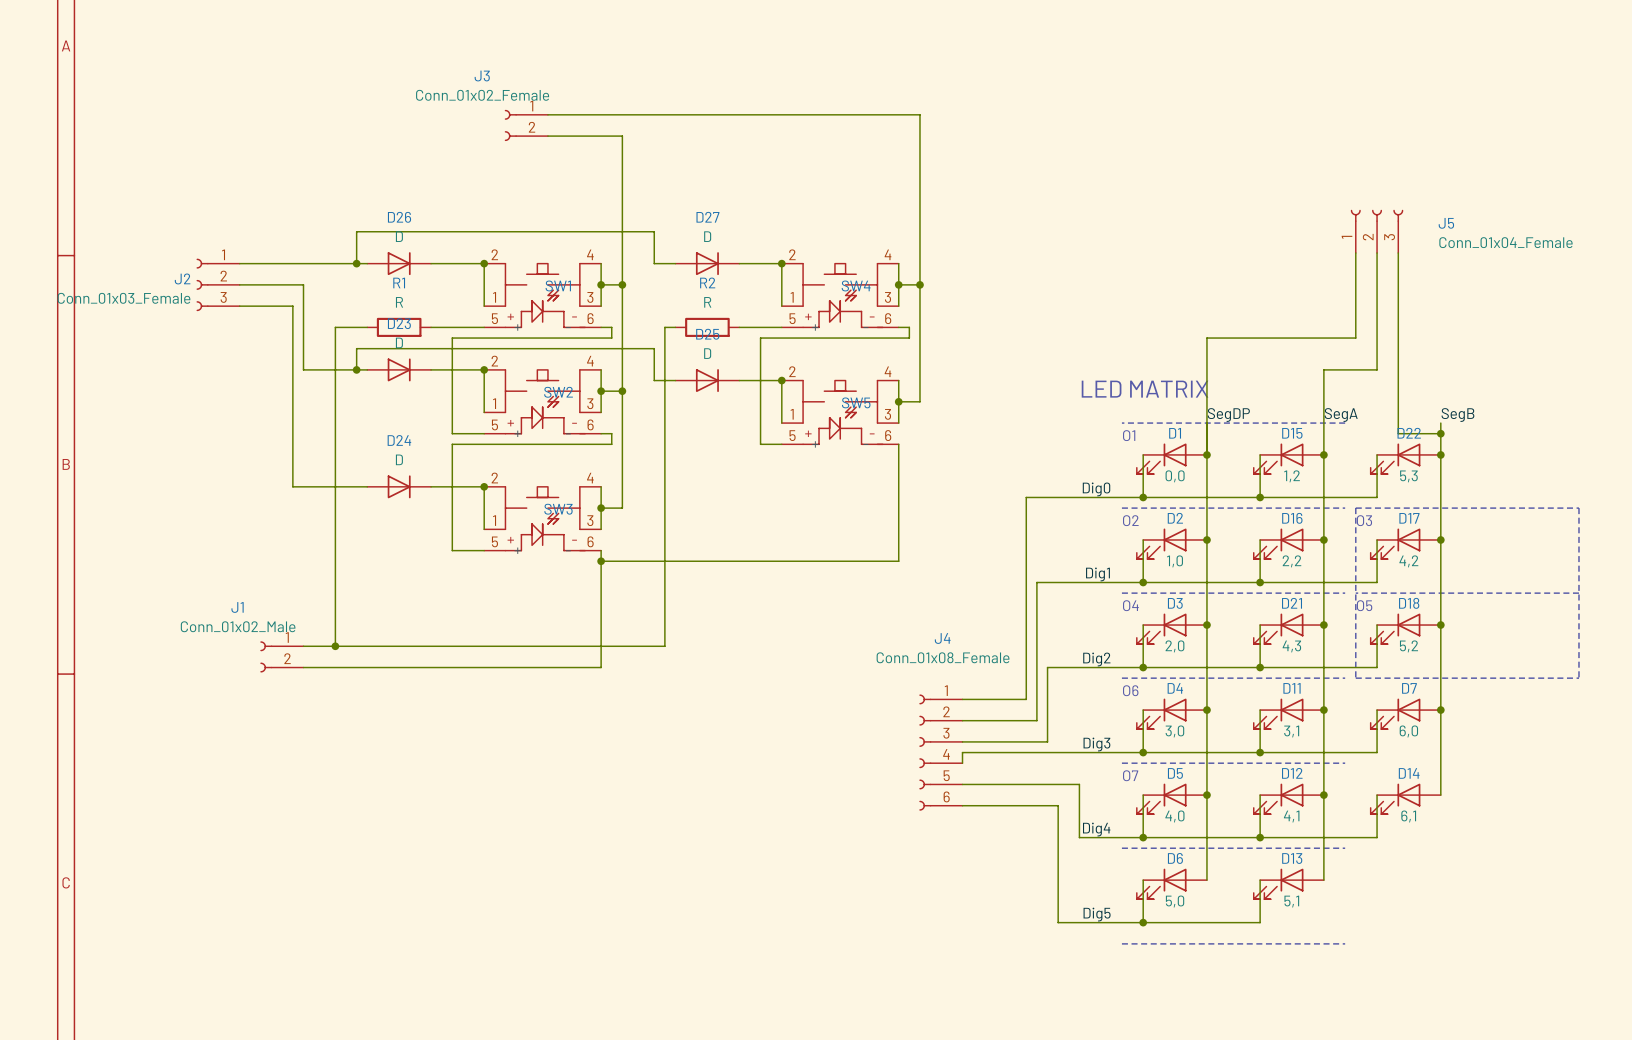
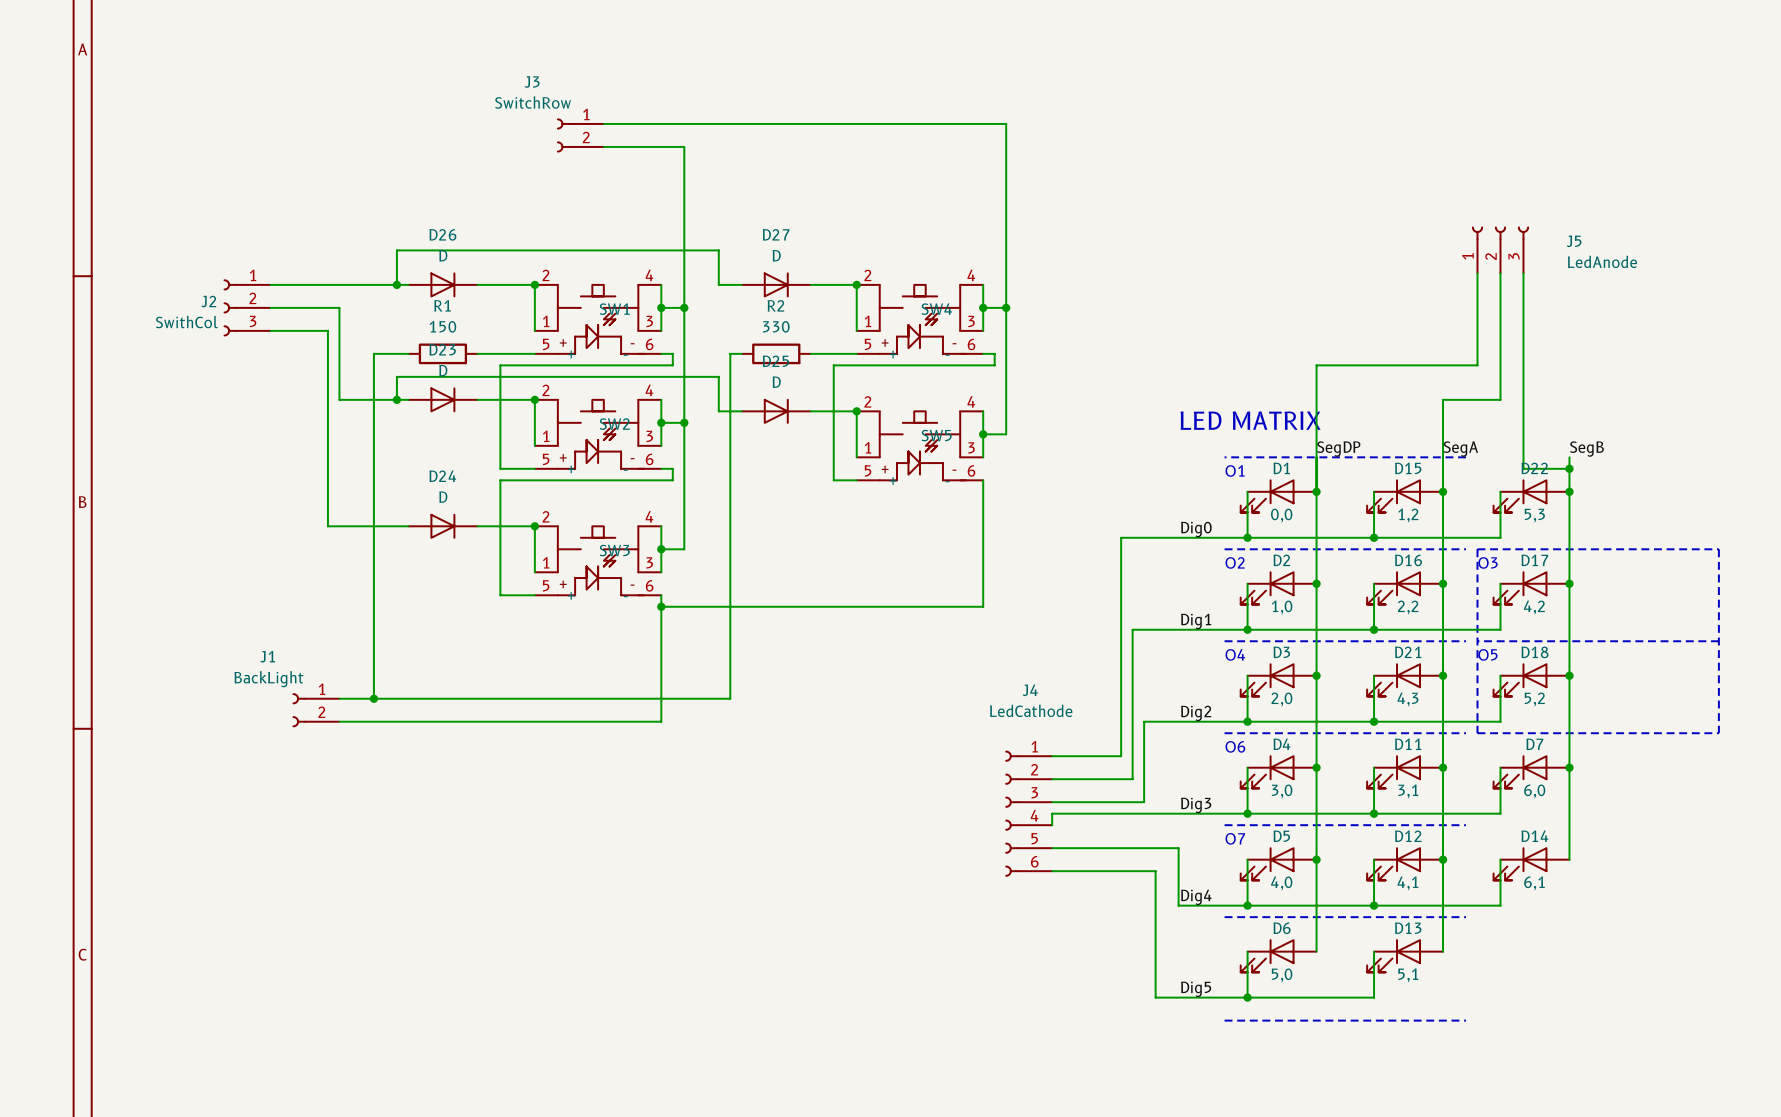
J3 value: Conn_01x02_Female (482, 95) -> SwitchRow (533, 102)
J5 value: Conn_01x04_Female (1505, 242) -> LedAnode (1602, 261)
J2 value: Conn_01x03_Female (123, 298) -> SwithCol (186, 322)
R1 value: R (399, 302) -> 150 (442, 326)
R2 value: R (707, 302) -> 330 (776, 326)
J1 value: Conn_01x02_Male (238, 626) -> BackLight (268, 679)
J4 value: Conn_01x08_Female (943, 657) -> LedCathode (1031, 710)

